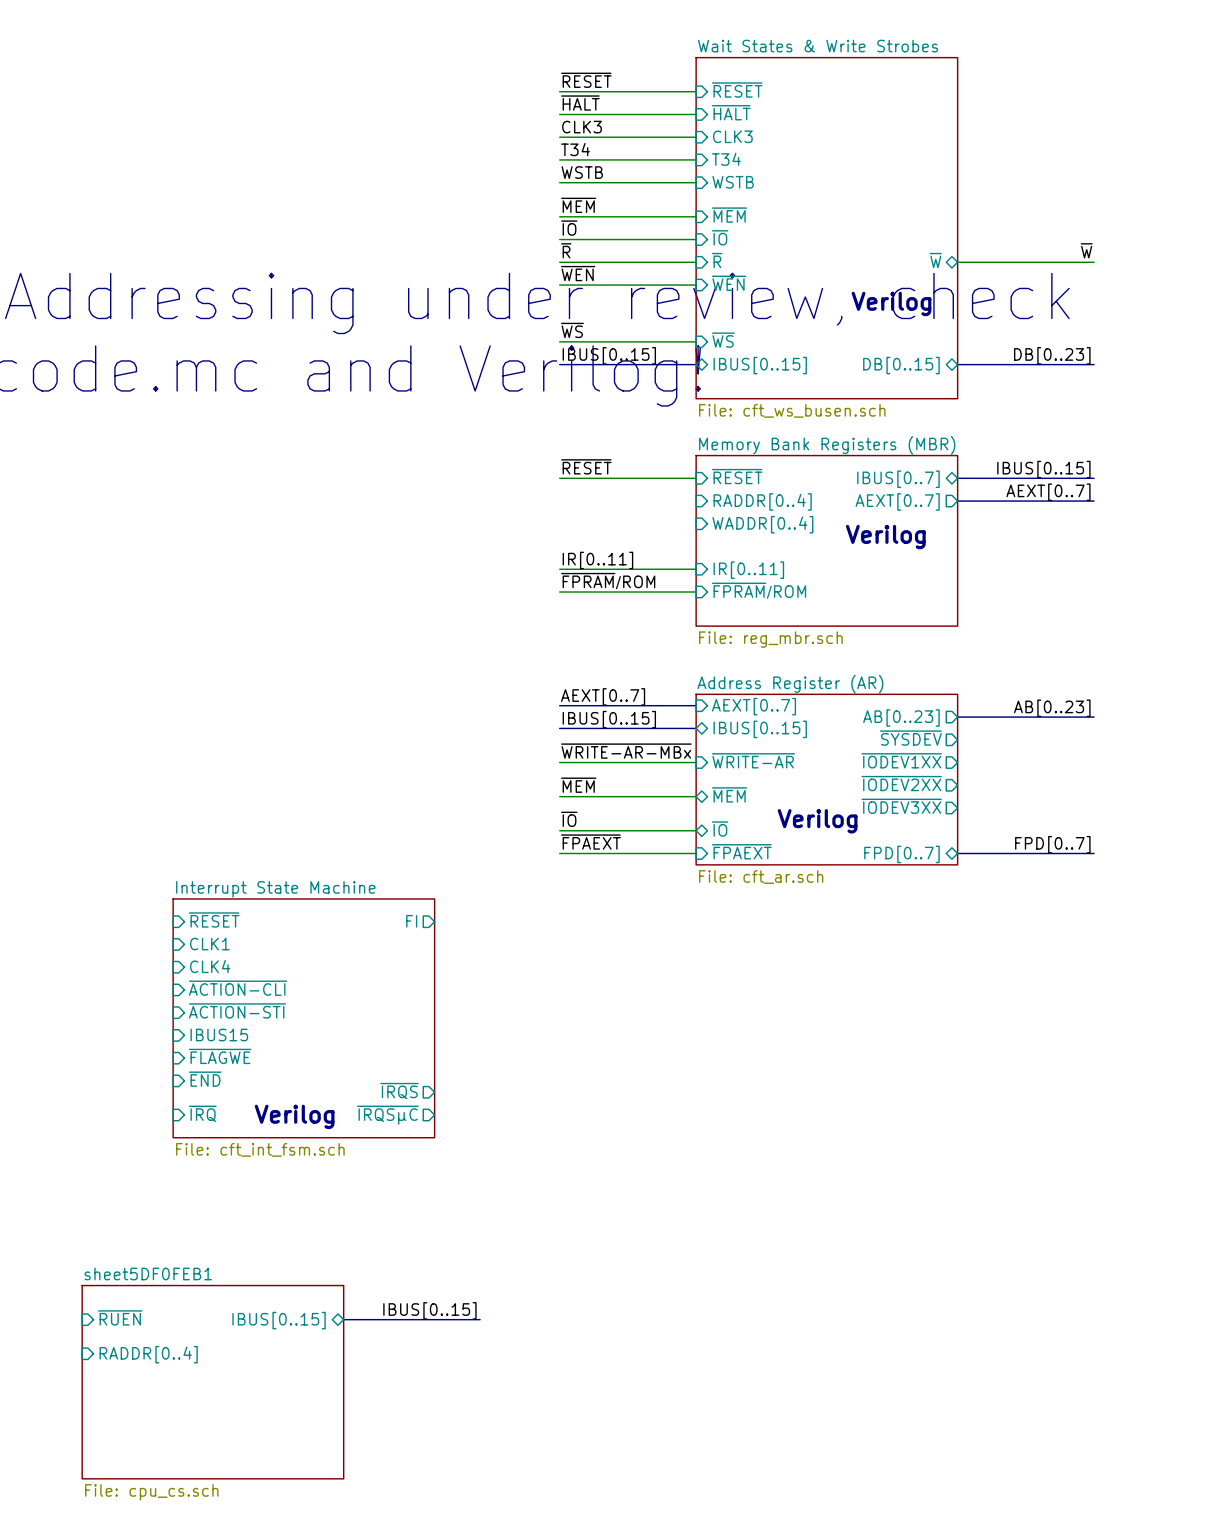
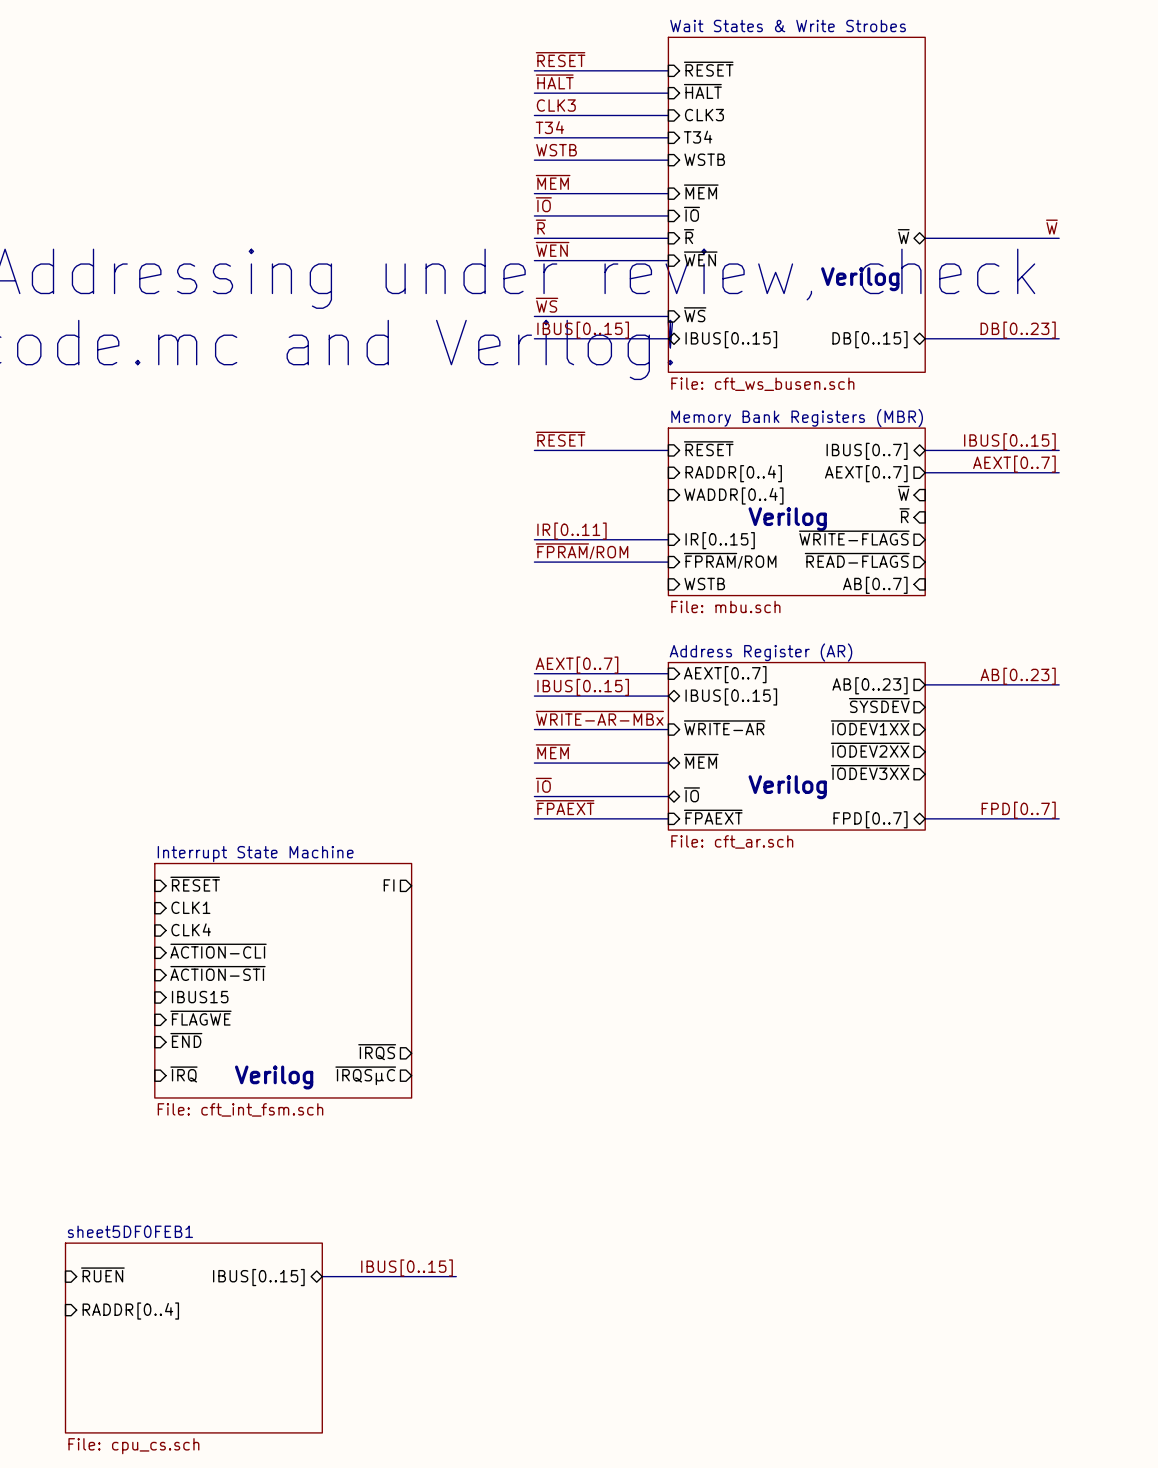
sheet pin: none -> ~{W} (903, 493)
text position: Verilog (885, 537) -> Verilog (787, 519)
sheet pin: none -> ~{R} (904, 515)
sheet pin: none -> ~{WRITE-FLAGS} (854, 538)
sheet pin: IR[0..11] (748, 570) -> IR[0..15] (720, 540)
sheet pin: none -> ~{READ-FLAGS} (857, 560)
sheet pin: none -> WSTB (704, 583)
sheet pin: none -> AB[0..7] (875, 585)
sheet Memory Bank Registers (MBR) value: File: reg_mbr.sch (770, 639) -> File: mbu.sch (725, 606)

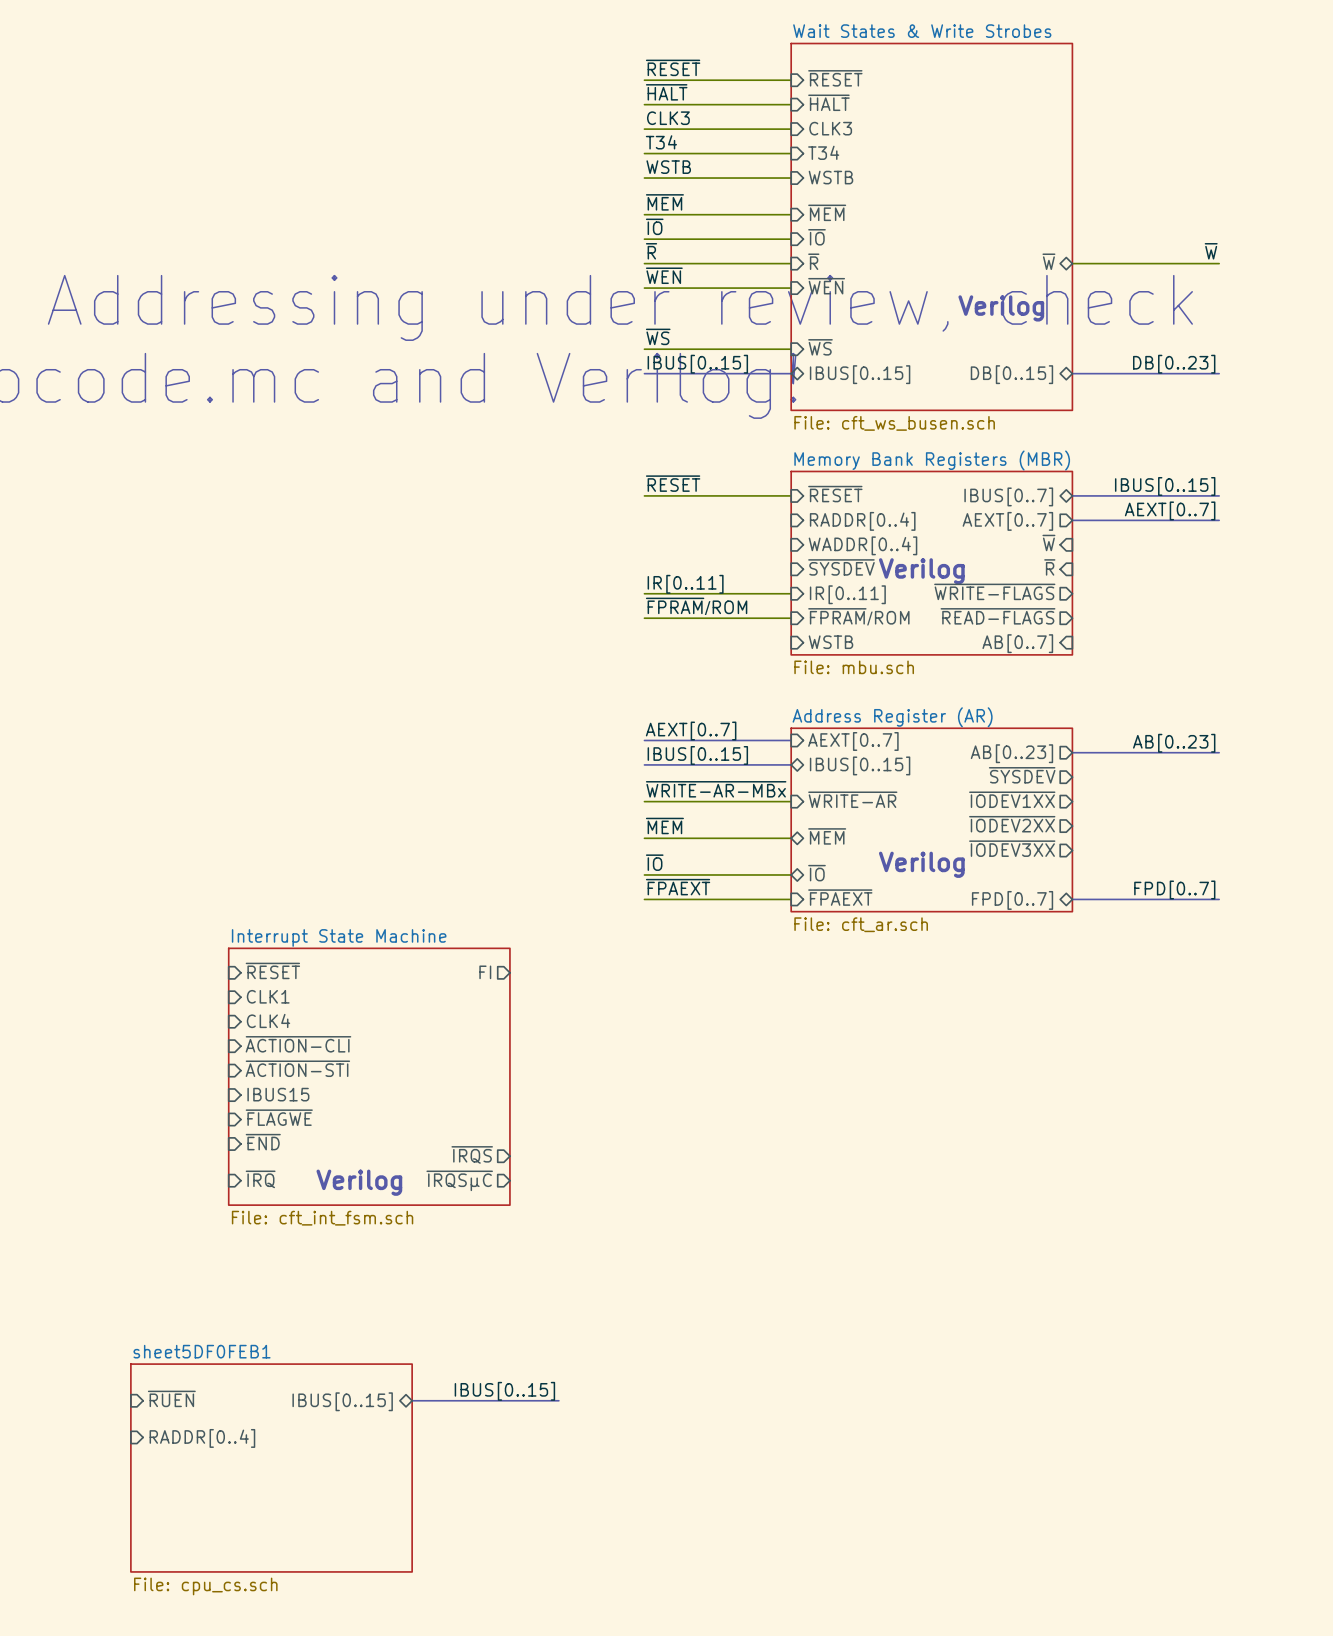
sheet pin: none -> ~{SYSDEV} (841, 567)
sheet pin: IR[0..15] (720, 540) -> IR[0..11] (847, 594)

